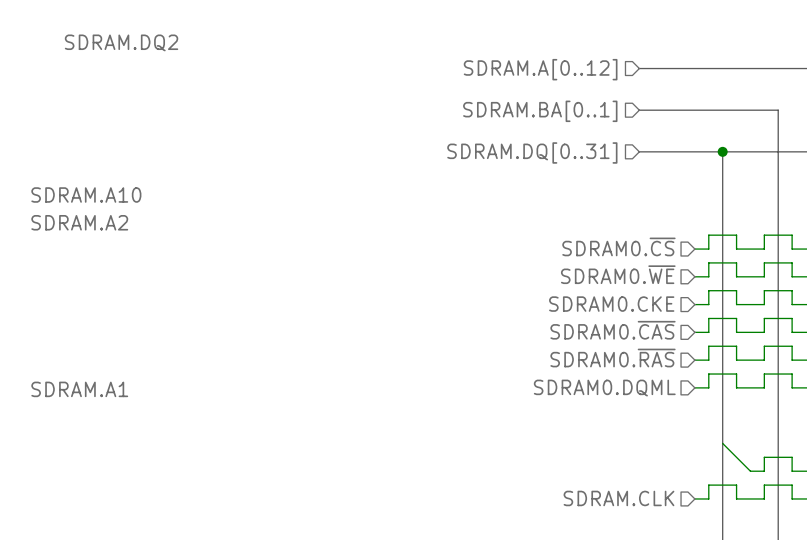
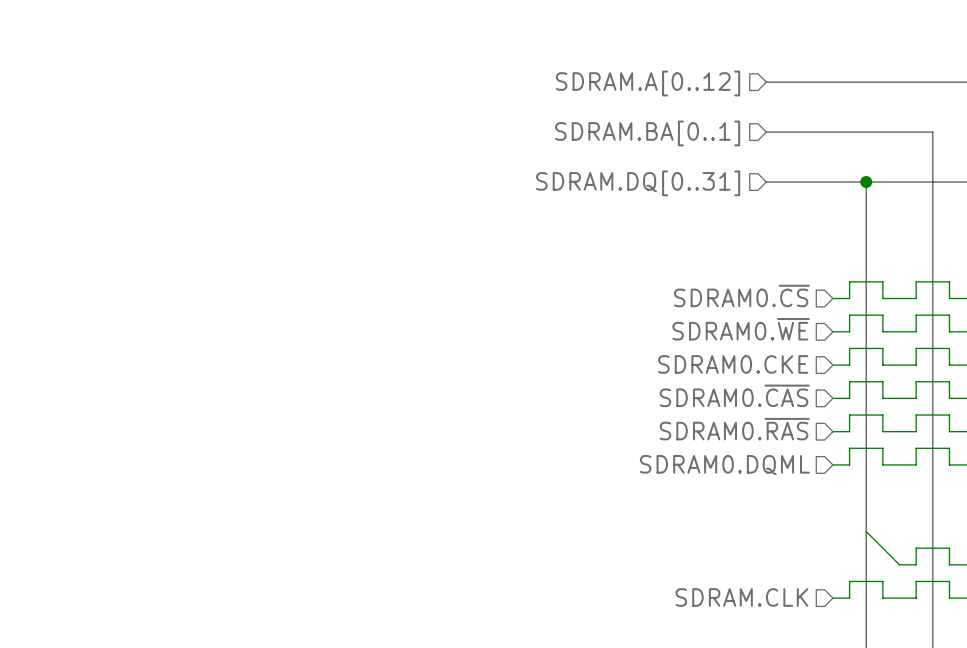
label: SDRAM.DQ2 (121, 42) -> none
label: SDRAM.A10 (86, 195) -> none
label: SDRAM.A2 (79, 222) -> none
label: SDRAM.A1 (79, 389) -> none

